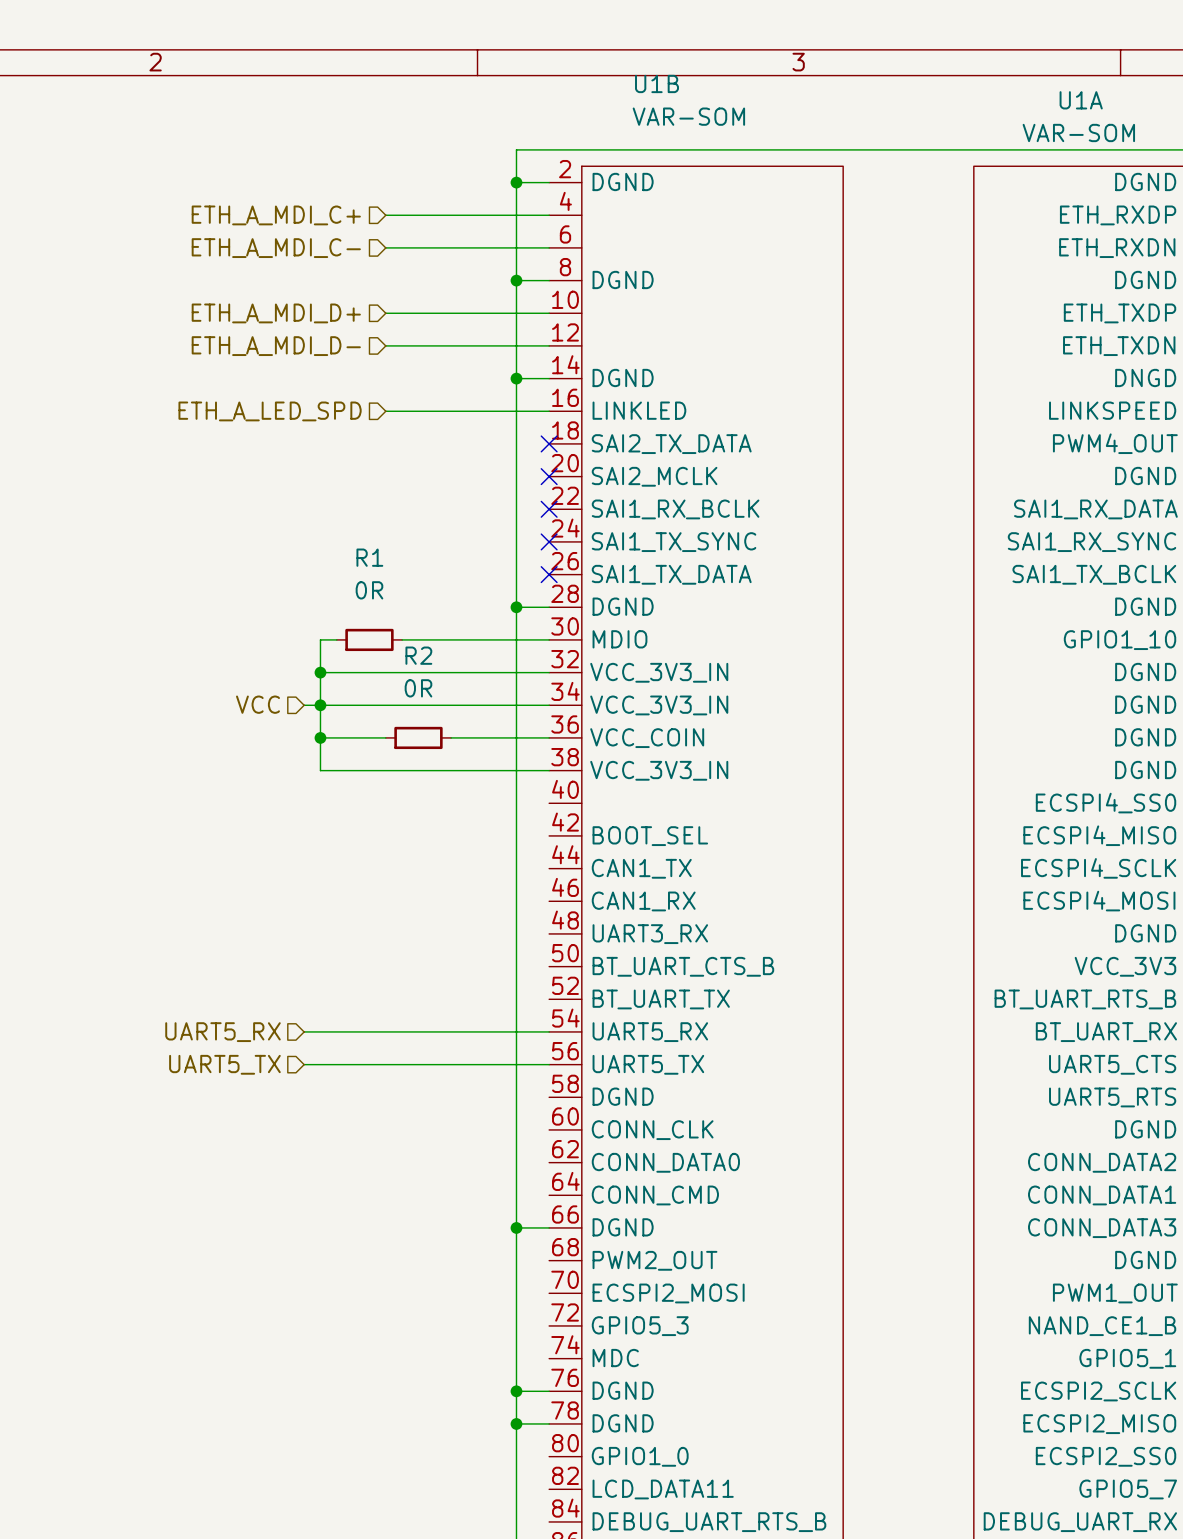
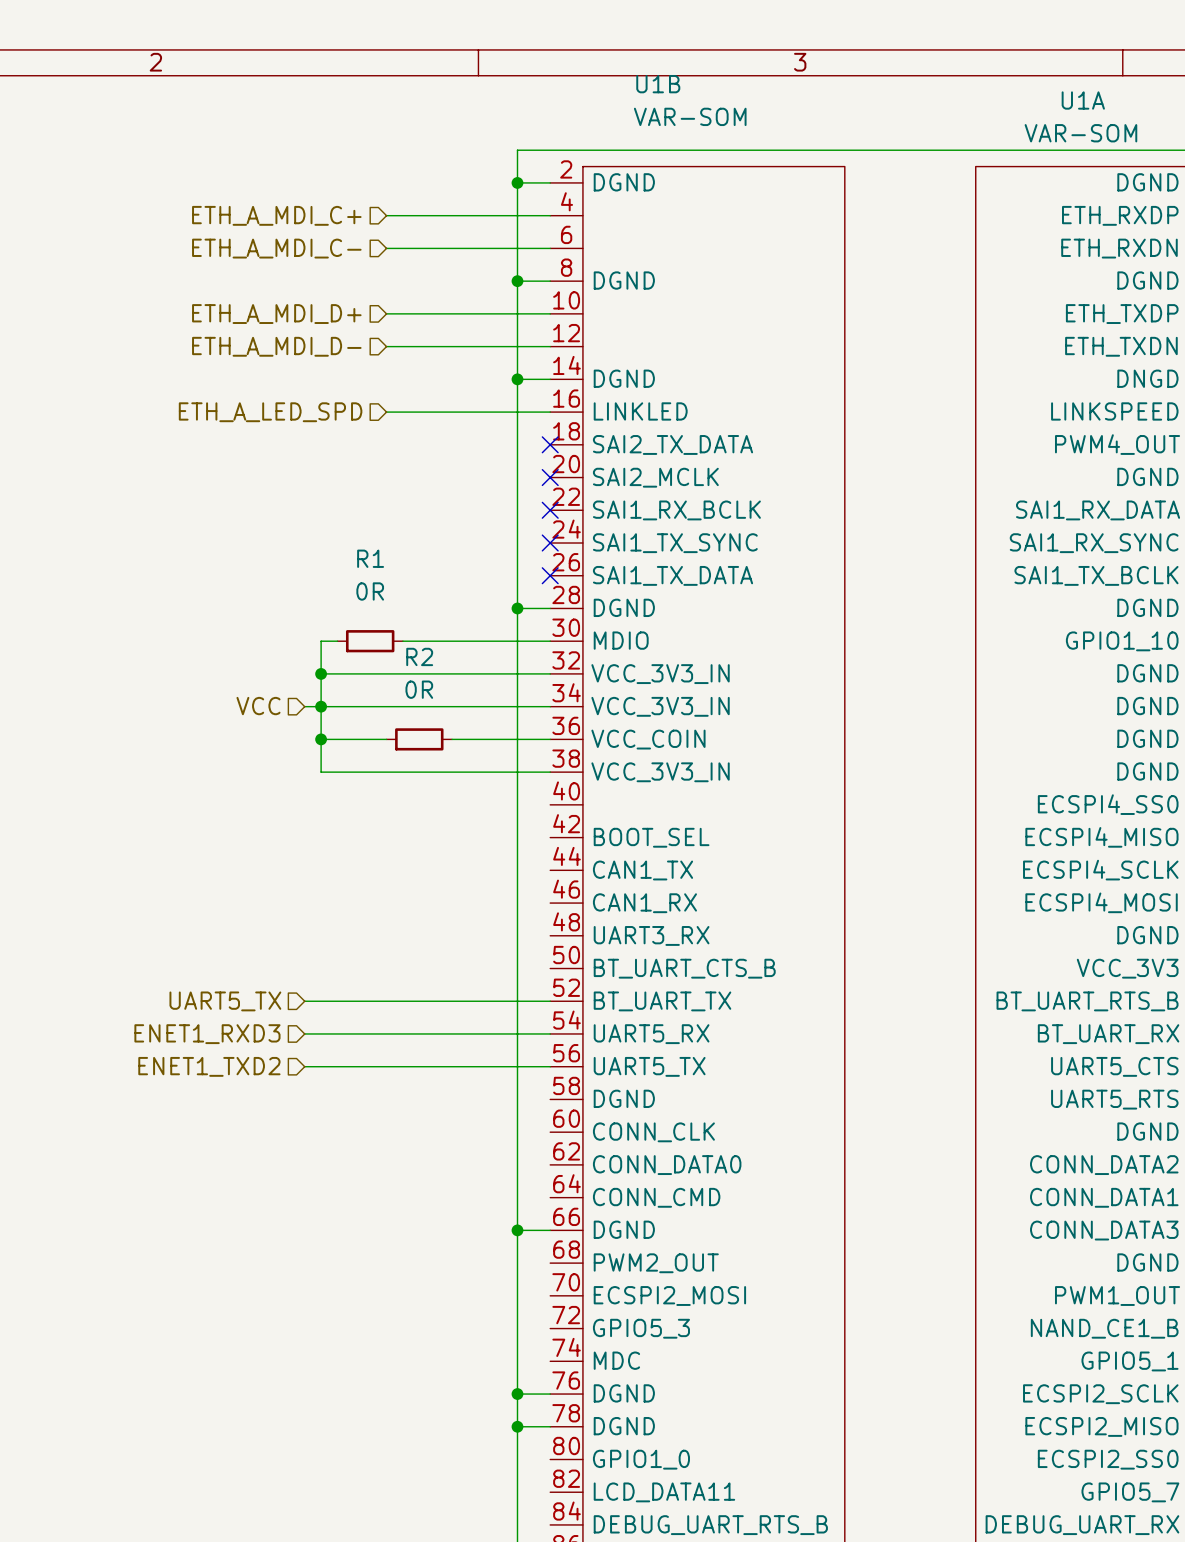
hierarchical label: none -> UART5_TX (225, 1001)
wire: none -> (304, 1001) (550, 1001)
hierarchical label: UART5_RX (222, 1032) -> ENET1_RXD3 (207, 1034)
hierarchical label: UART5_TX (224, 1064) -> ENET1_TXD2 (209, 1066)

